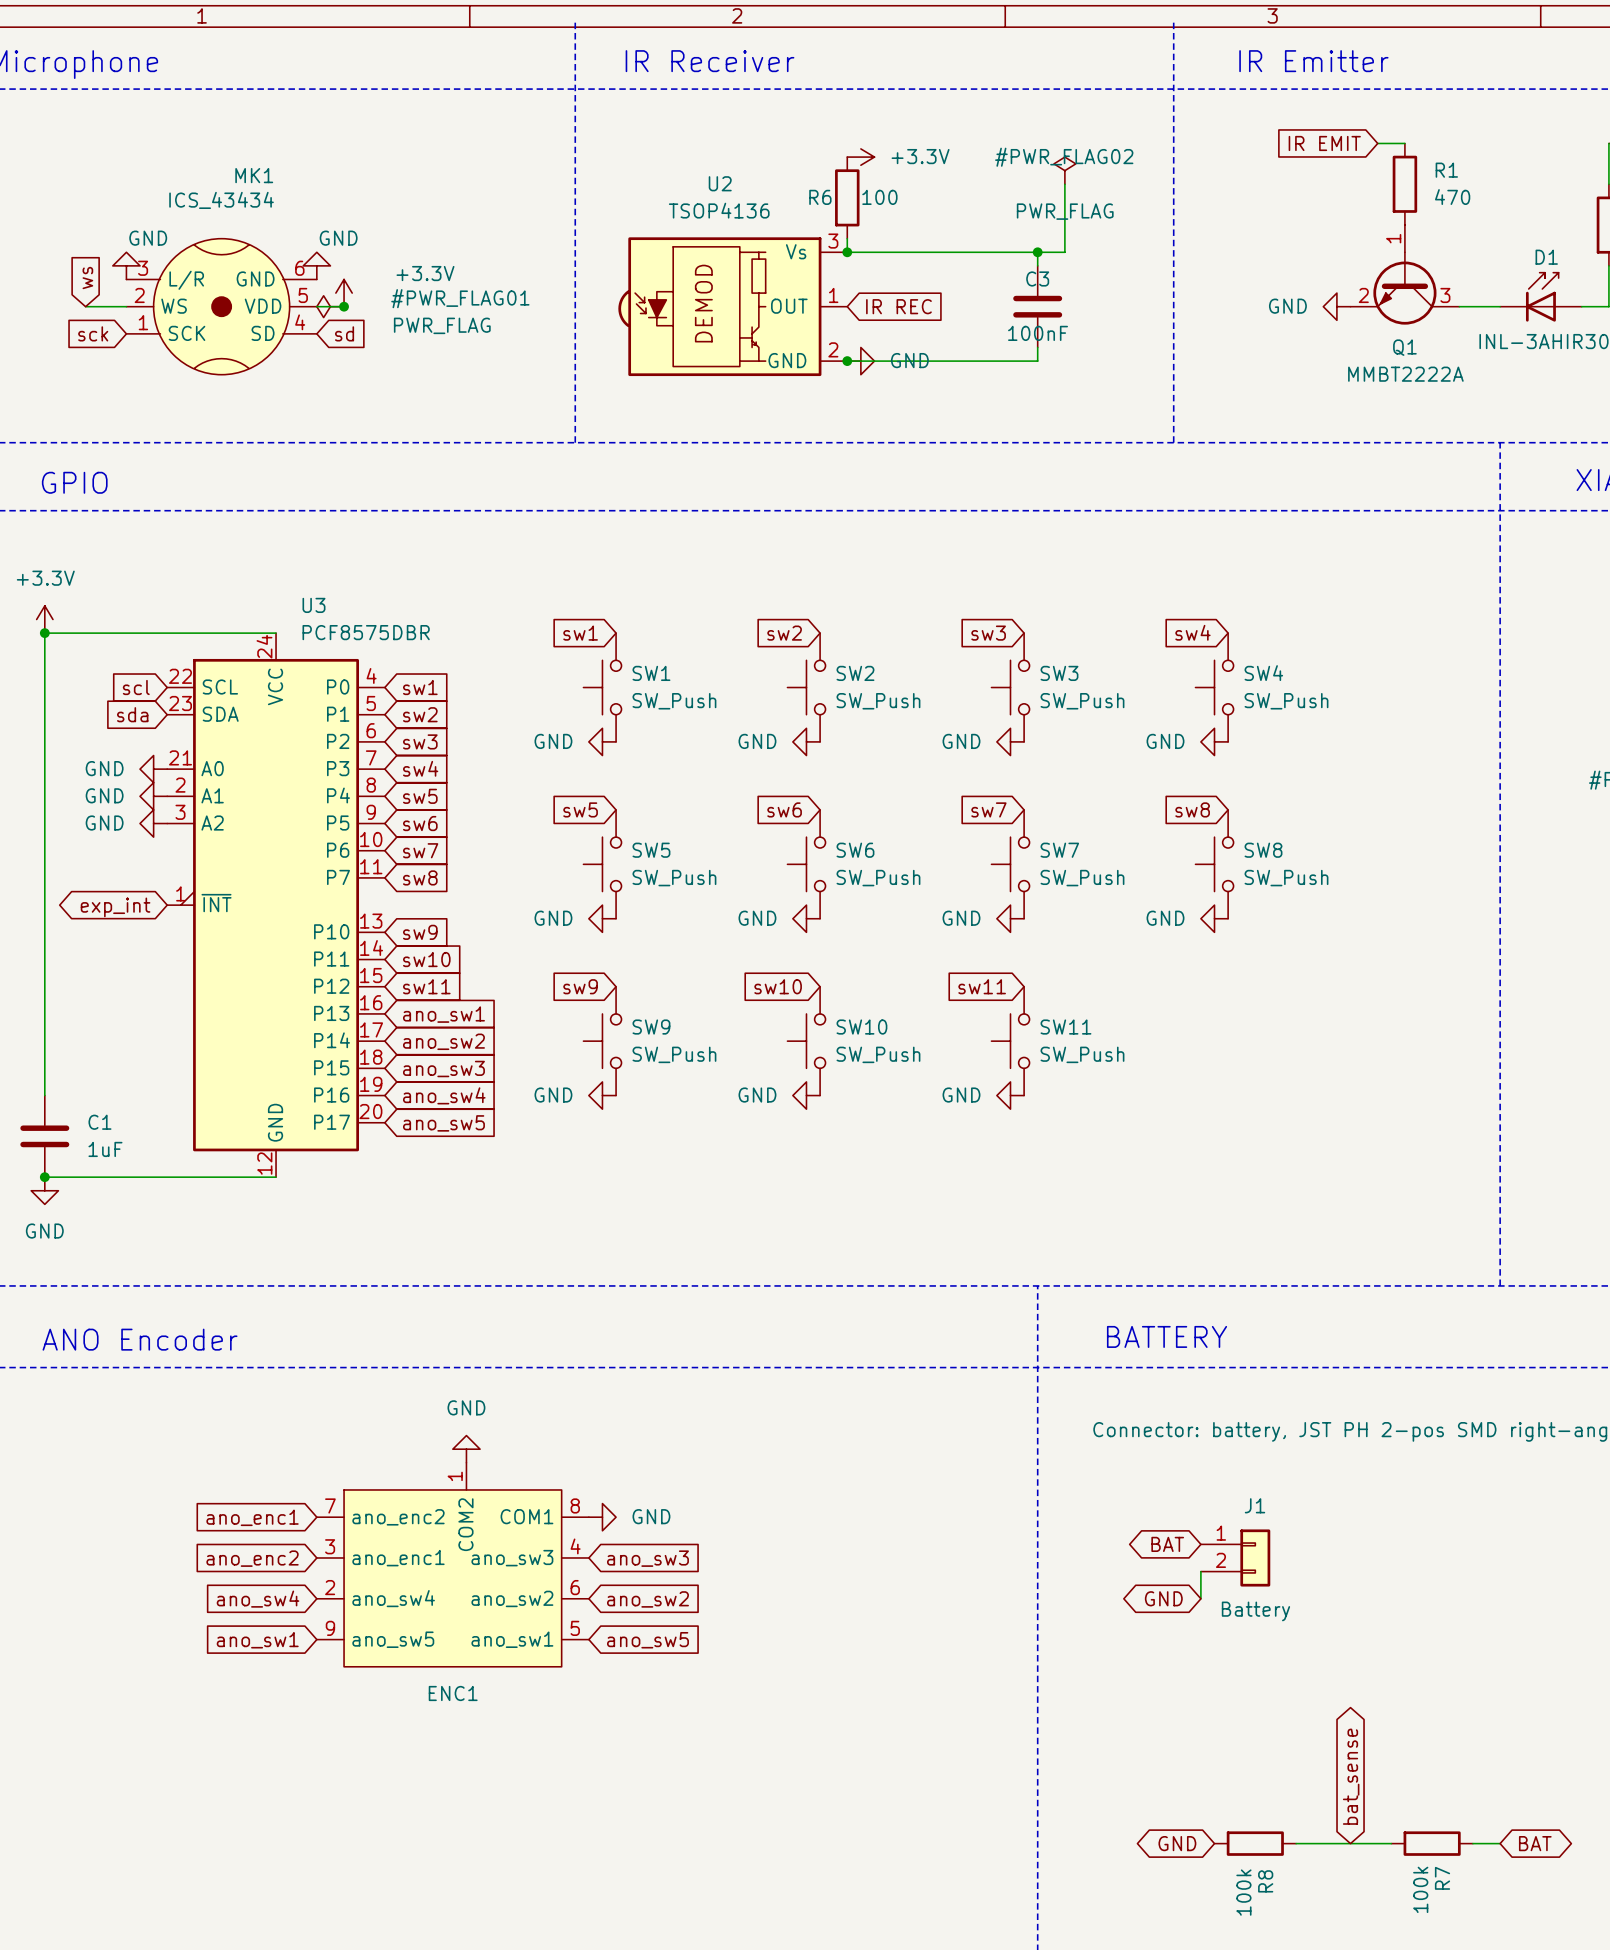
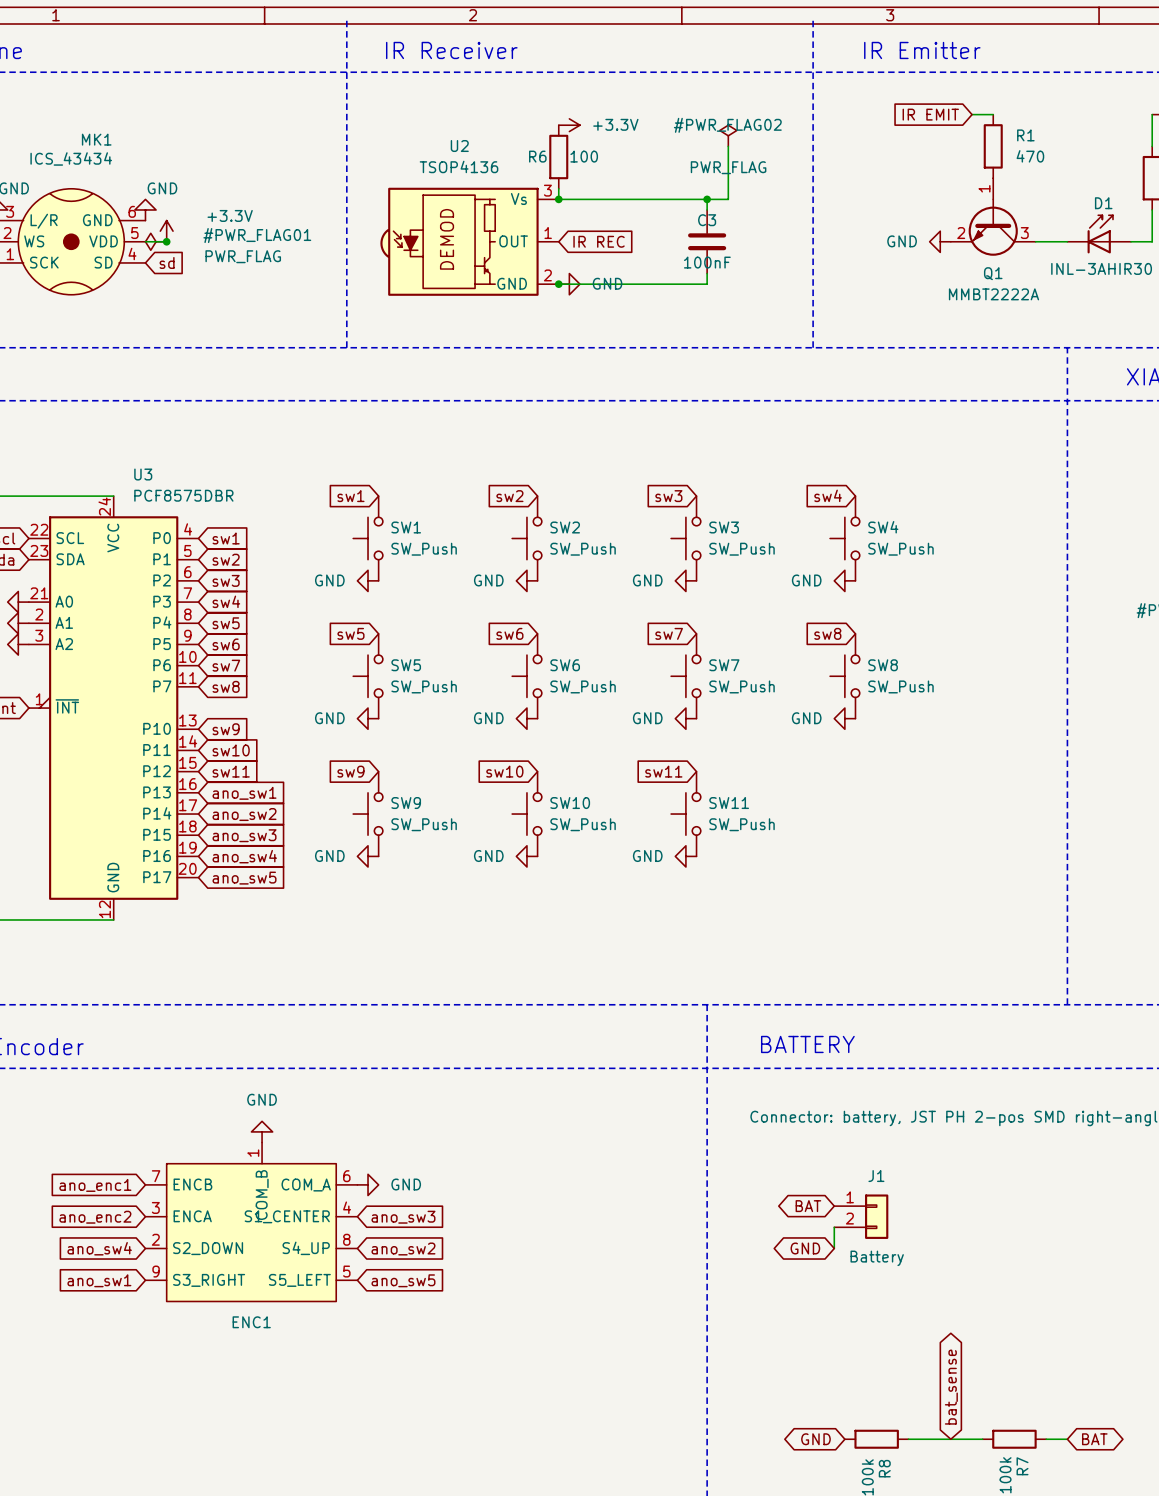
ENC1 symbol: [316, 1462, 589, 1667] -> [145, 1142, 358, 1302]

